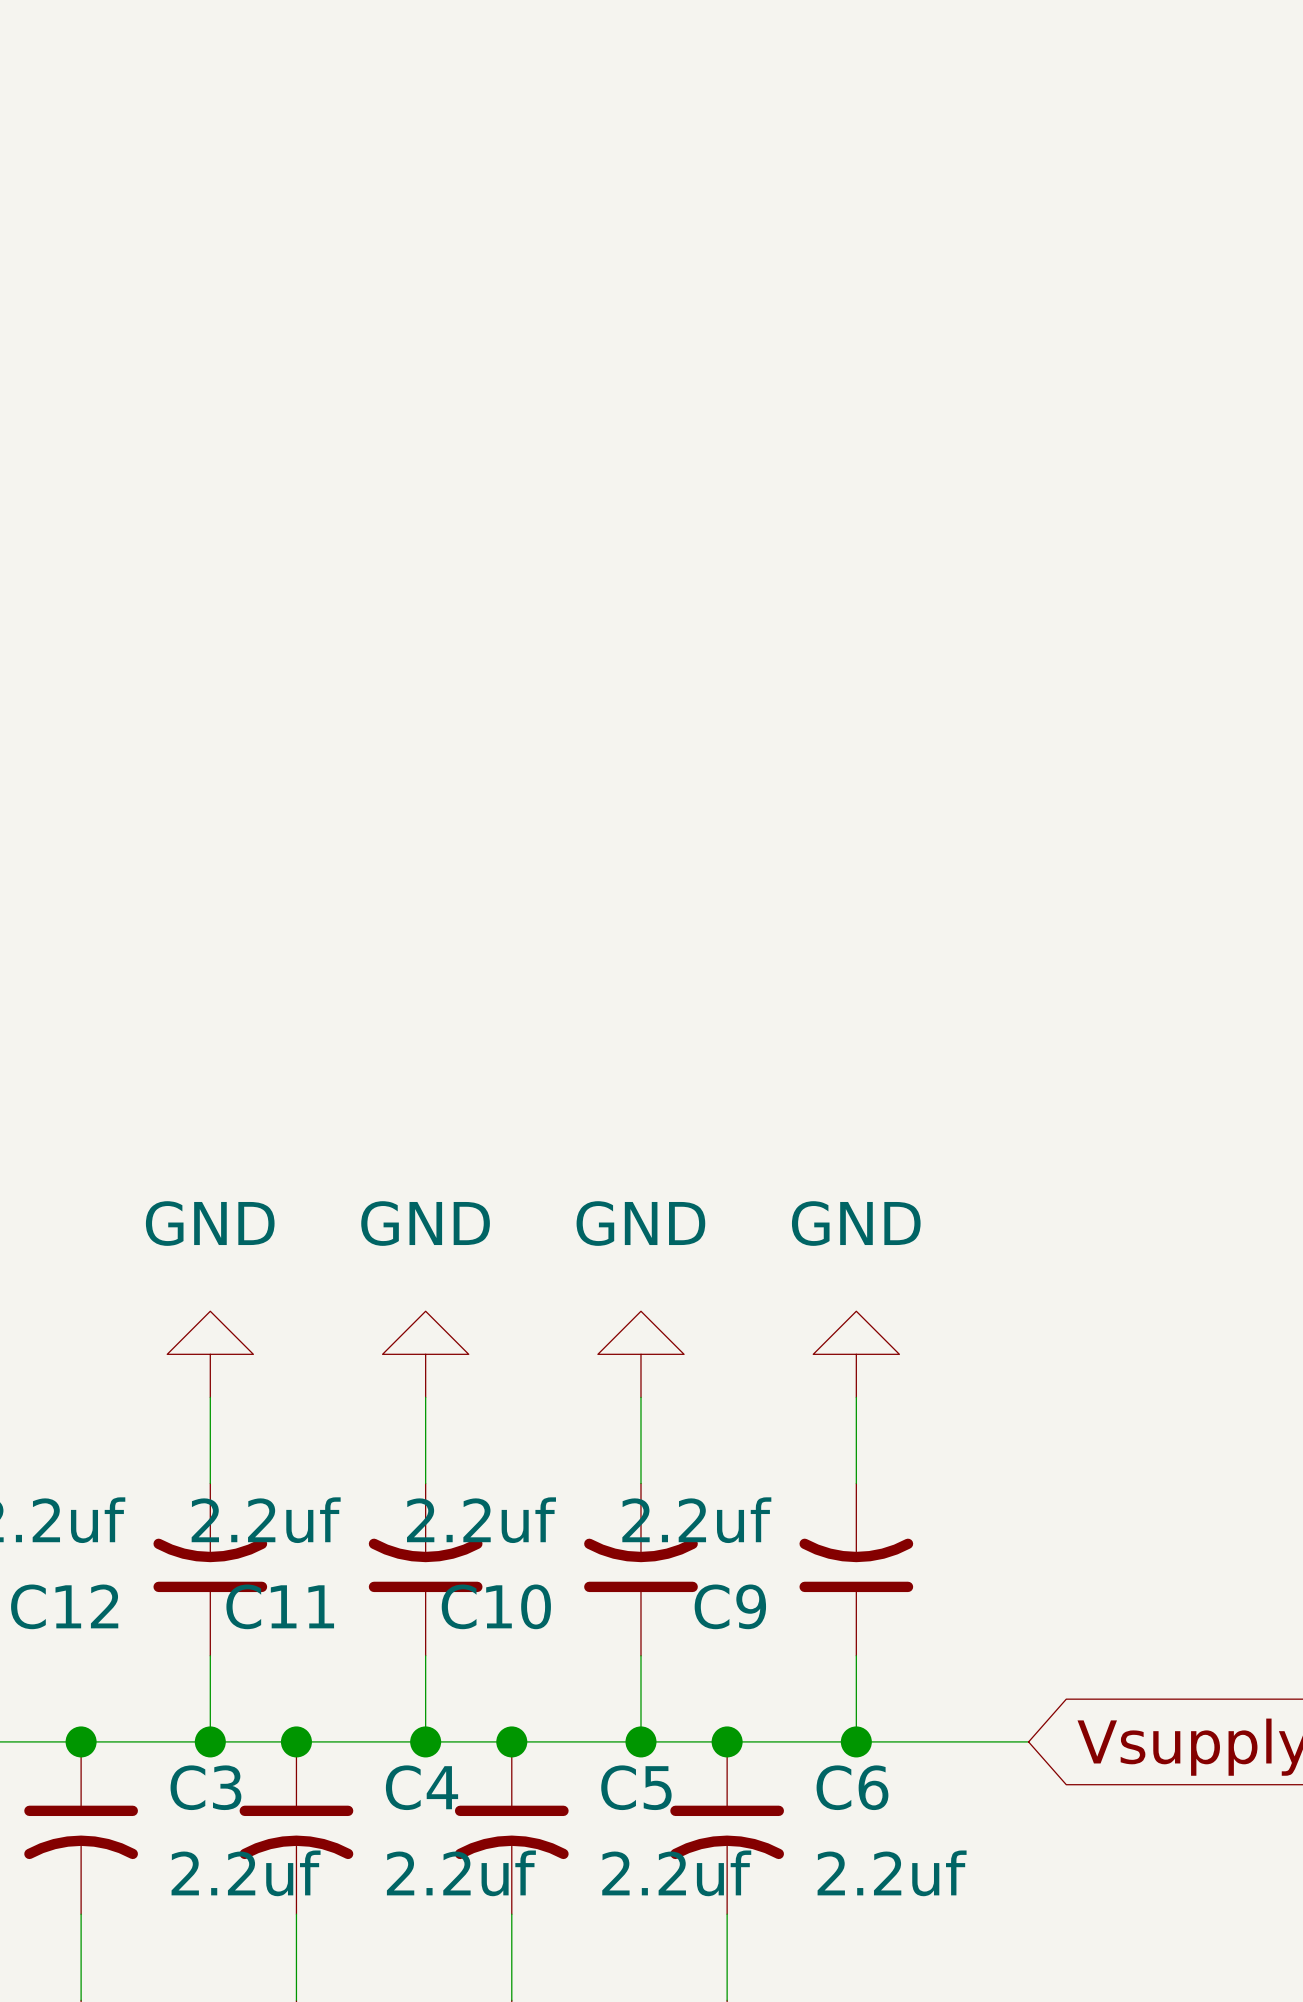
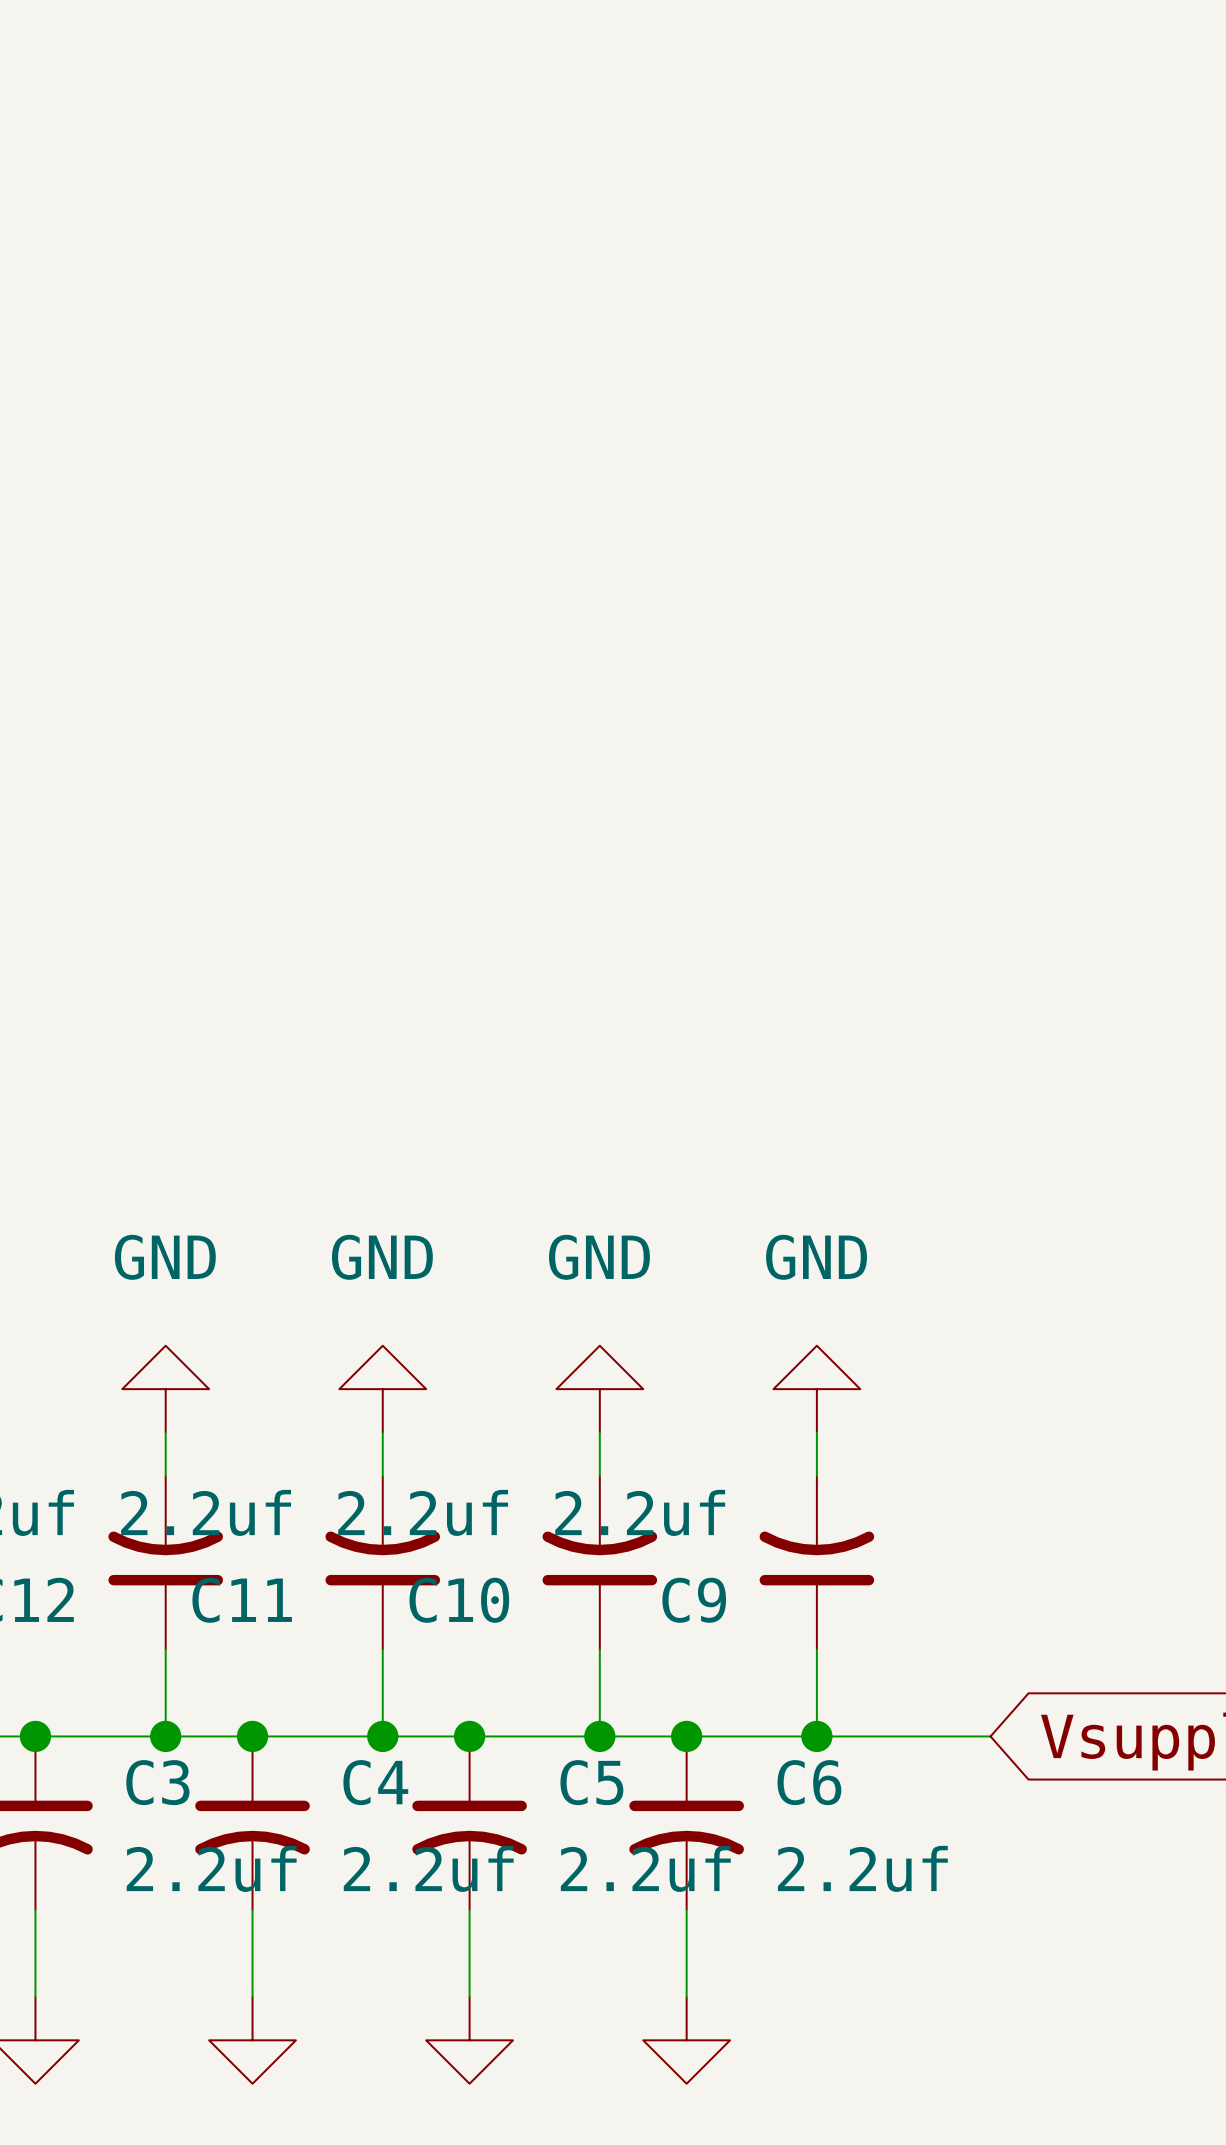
power symbol position: GND (210, 1354) -> GND (165, 1389)
power symbol position: GND (425, 1354) -> GND (382, 1389)
power symbol position: GND (640, 1354) -> GND (599, 1389)
power symbol position: GND (856, 1354) -> GND (816, 1389)

